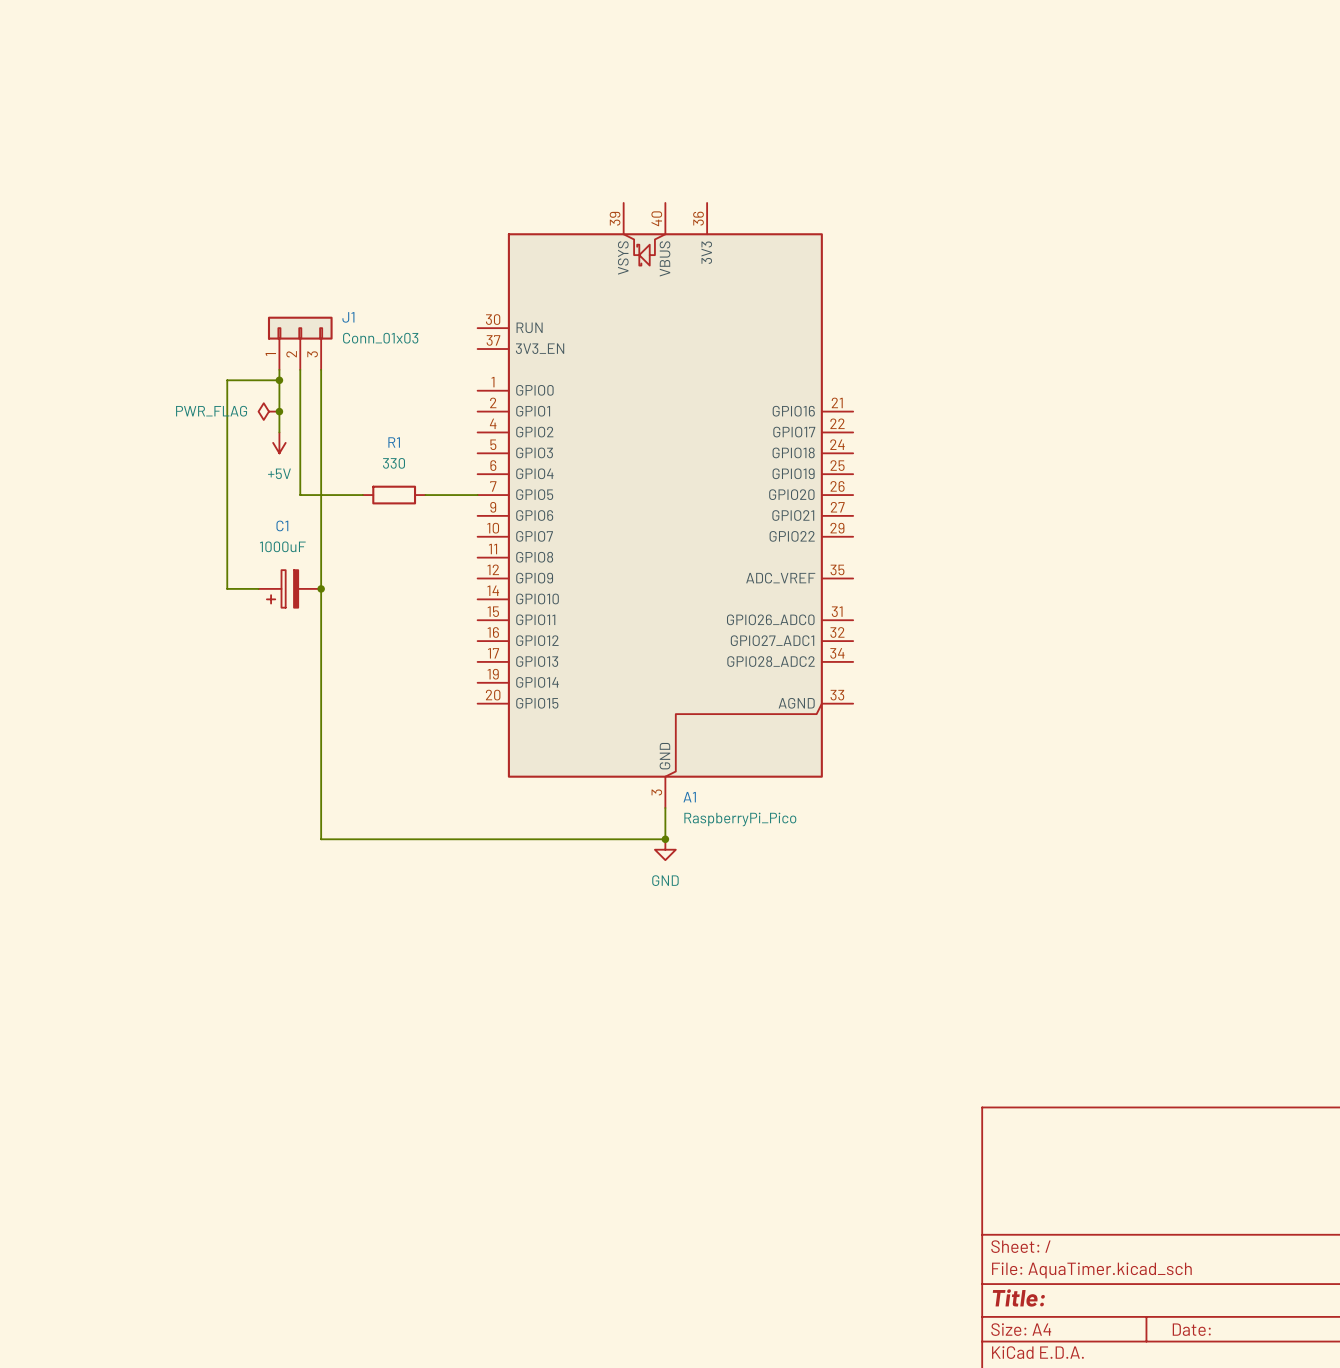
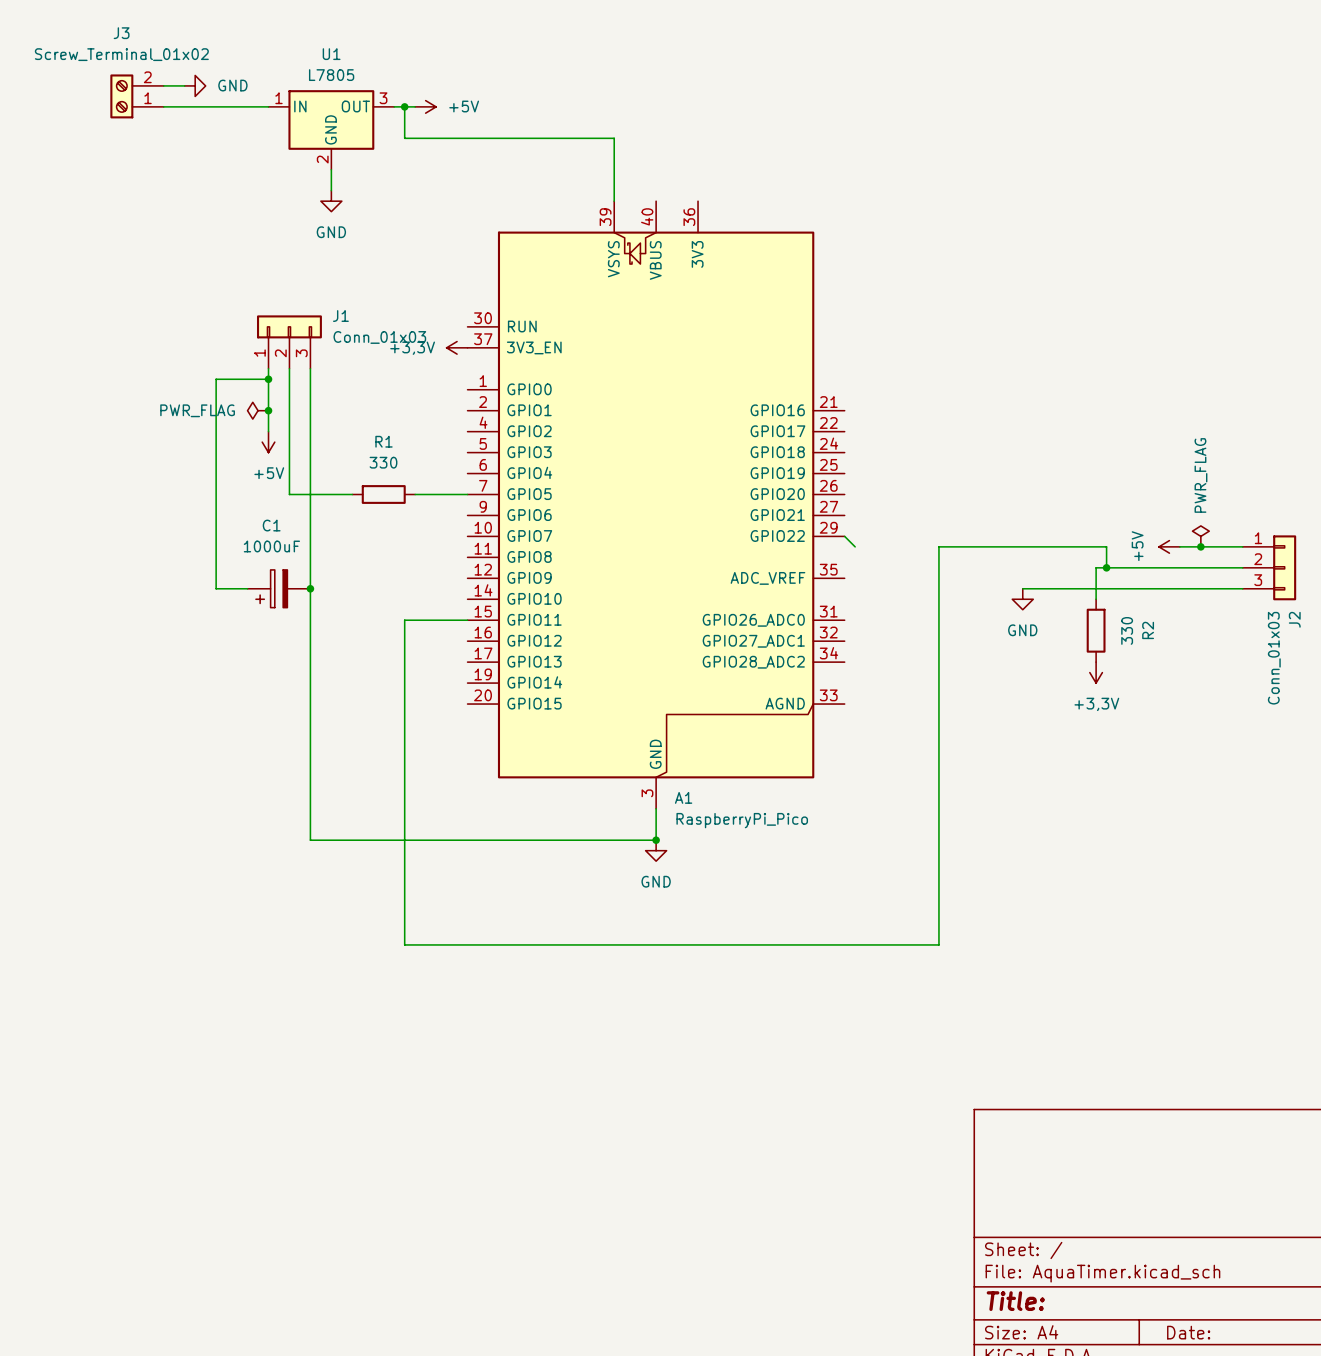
wire: none -> (163, 85) (184, 85)
power symbol: none -> GND (195, 85)
J3: none -> Screw_Terminal_01x02 (137, 96)
wire: none -> (163, 106) (268, 106)
wire: none -> (394, 106) (415, 106)
wire: none -> (404, 106) (404, 138) (614, 138) (614, 201)
junction: none -> (404, 106)
power symbol: none -> +5V (425, 106)
U1: none -> L7805 (331, 129)
wire: none -> (331, 169) (331, 190)
power symbol: none -> GND (331, 201)
power symbol: none -> +3,3V (457, 347)
wire: none -> (844, 536) (855, 546)
power symbol: none -> PWR_FLAG (1200, 536)
power symbol: none -> +5V (1169, 546)
wire: none -> (1179, 546) (1242, 546)
junction: none -> (1200, 546)
wire: none -> (1106, 567) (1106, 546) (938, 546) (938, 944) (404, 944) (404, 620) (467, 620)
junction: none -> (1106, 567)
wire: none -> (1242, 567) (1096, 567) (1096, 599)
J2: none -> Conn_01x03 (1269, 567)
wire: none -> (1022, 588) (1242, 588)
power symbol: none -> GND (1022, 599)
R2: none -> 330 (1096, 630)
power symbol: none -> +3,3V (1096, 672)

